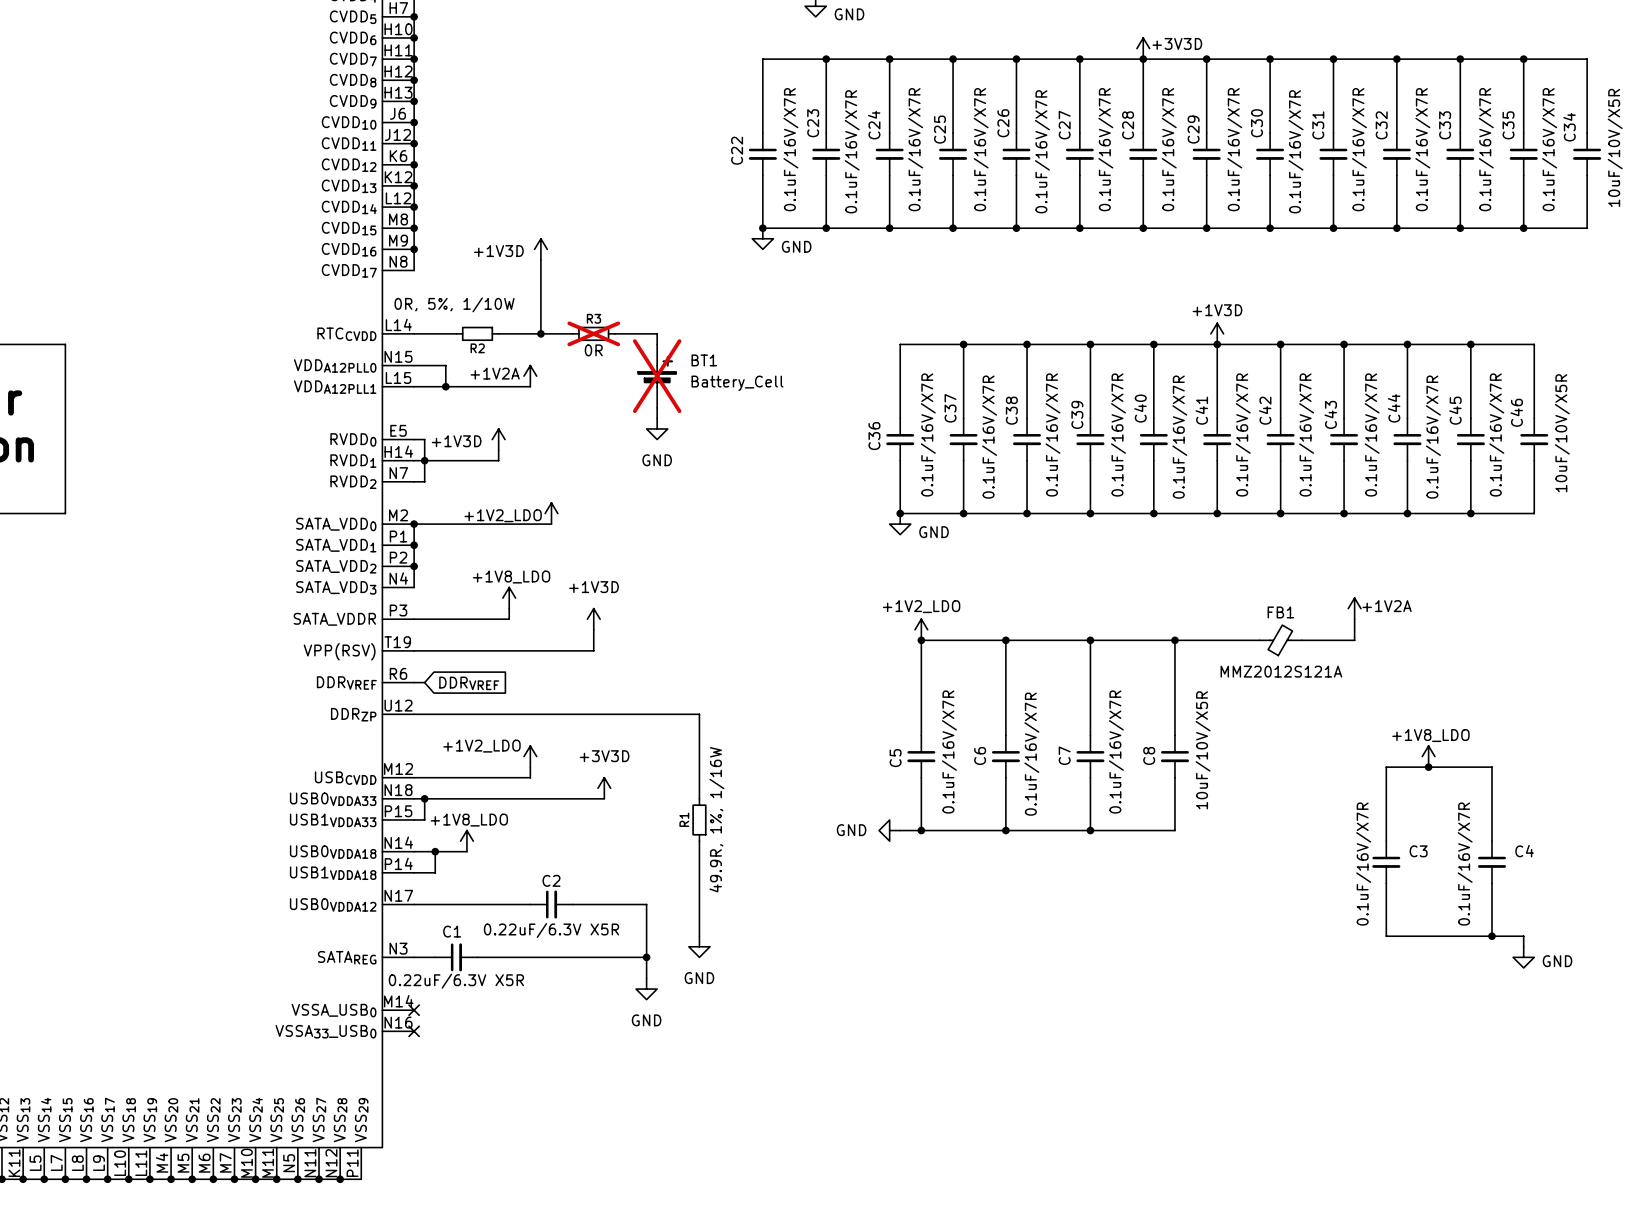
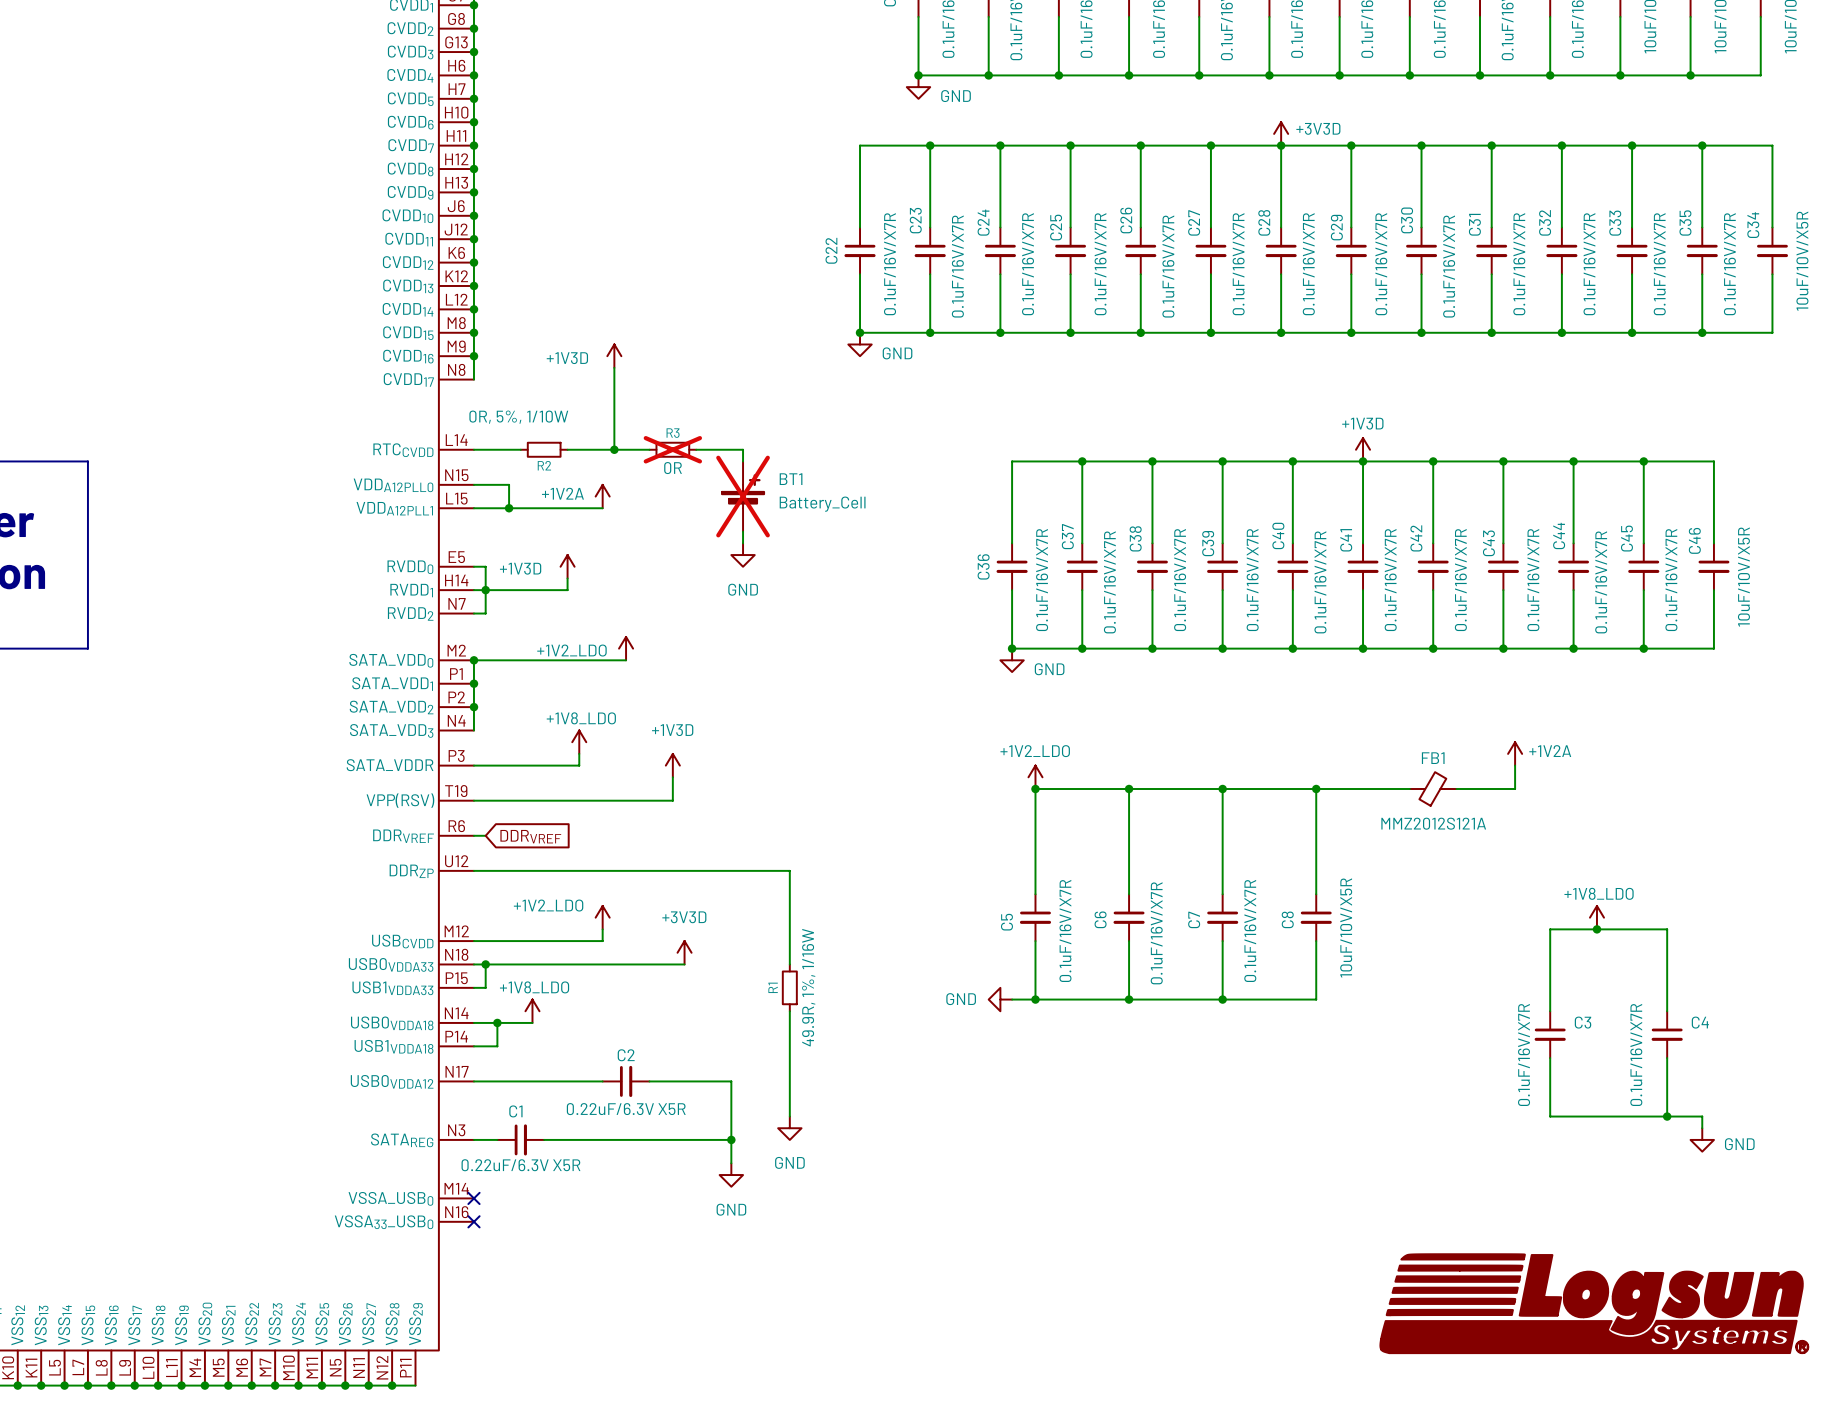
power symbol: none -> (1594, 1303)

